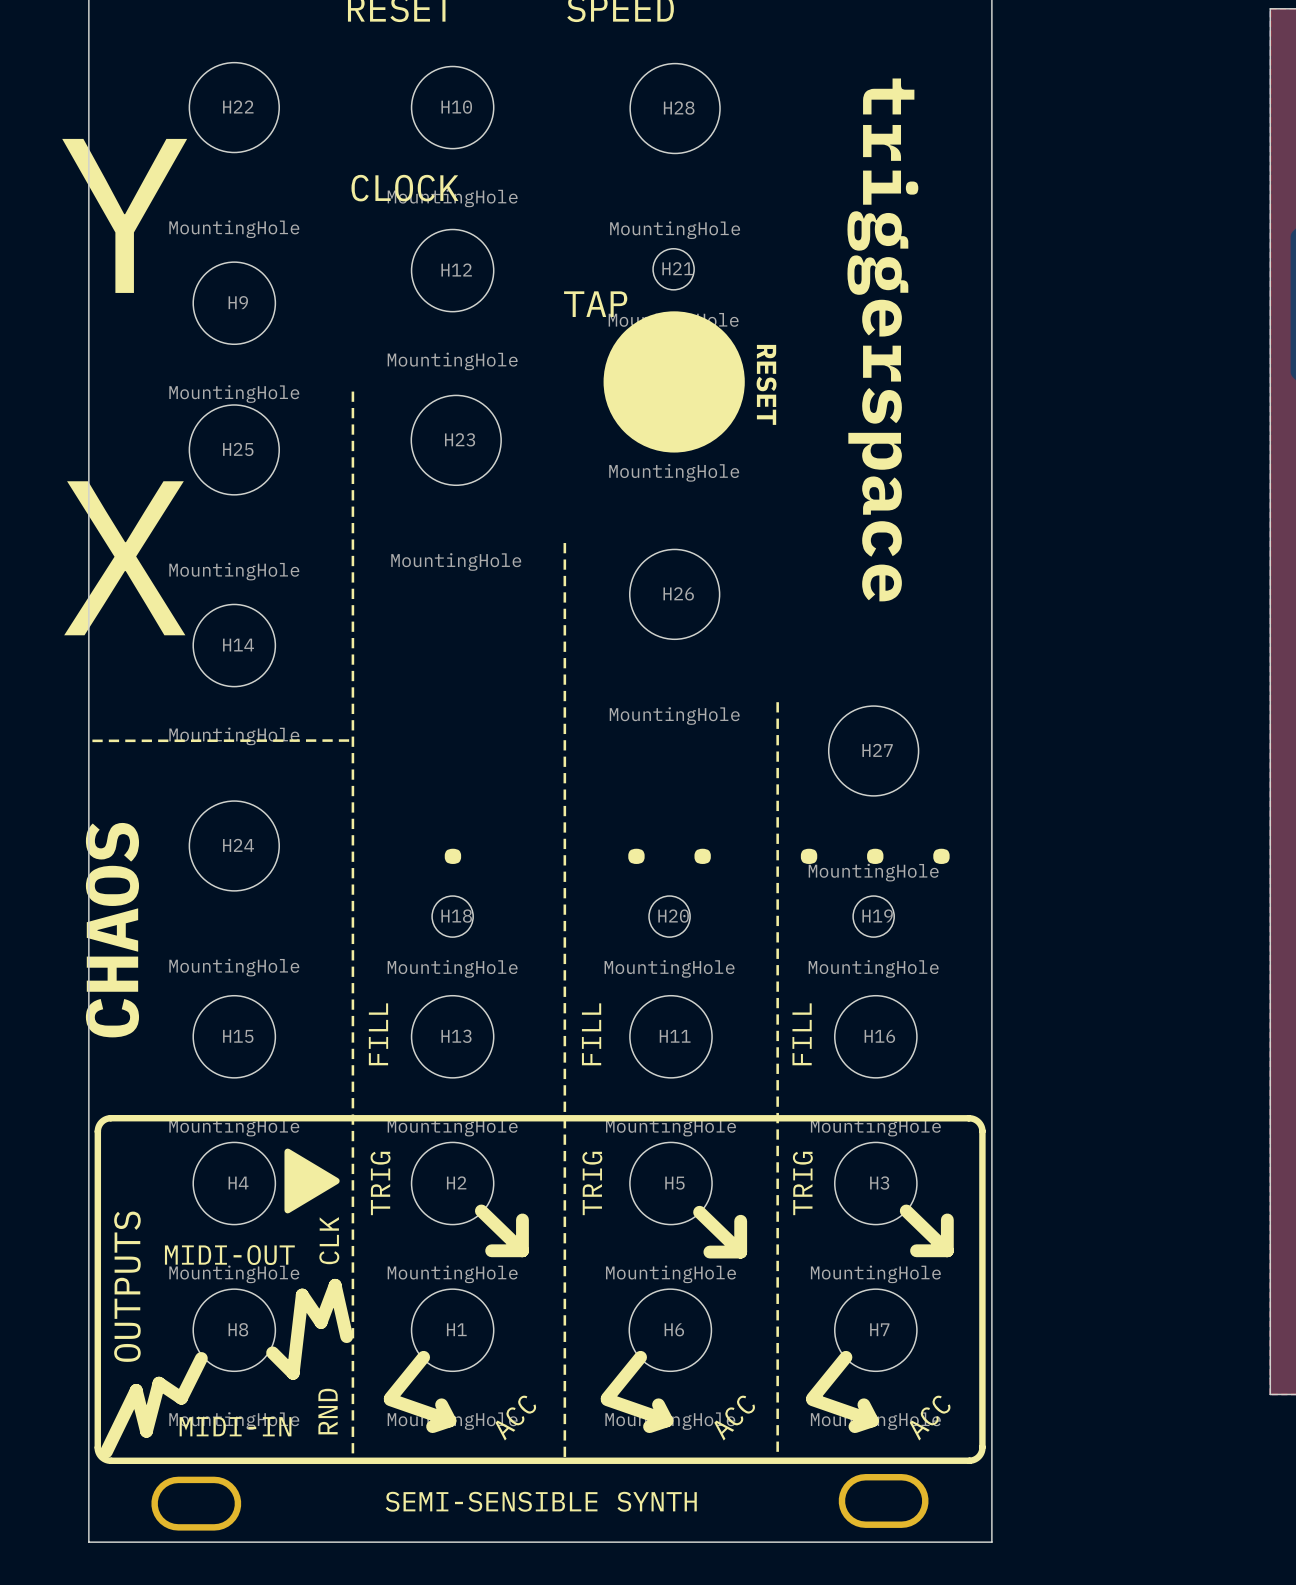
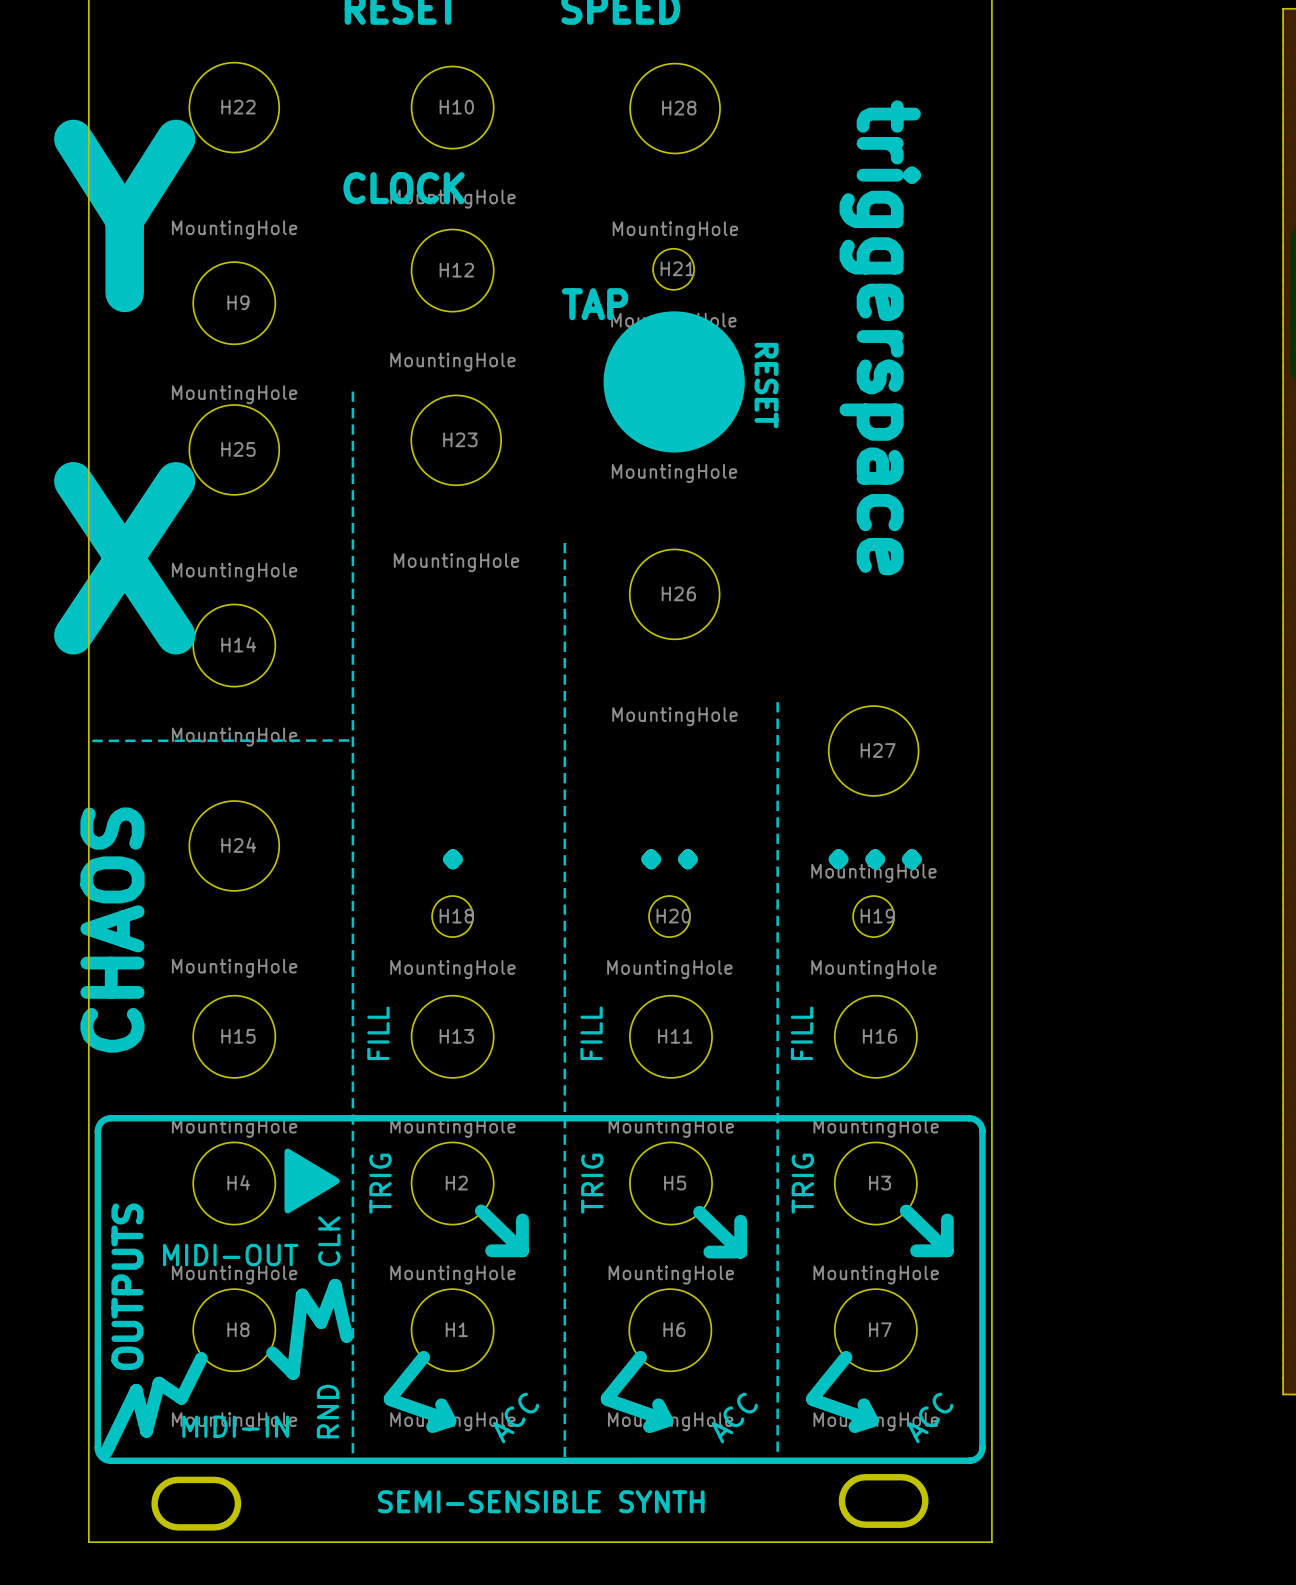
board edge: (1283, 8) (1270, 8) (1270, 1394) (1283, 1394) -> (1283, 8) (1283, 1394)

